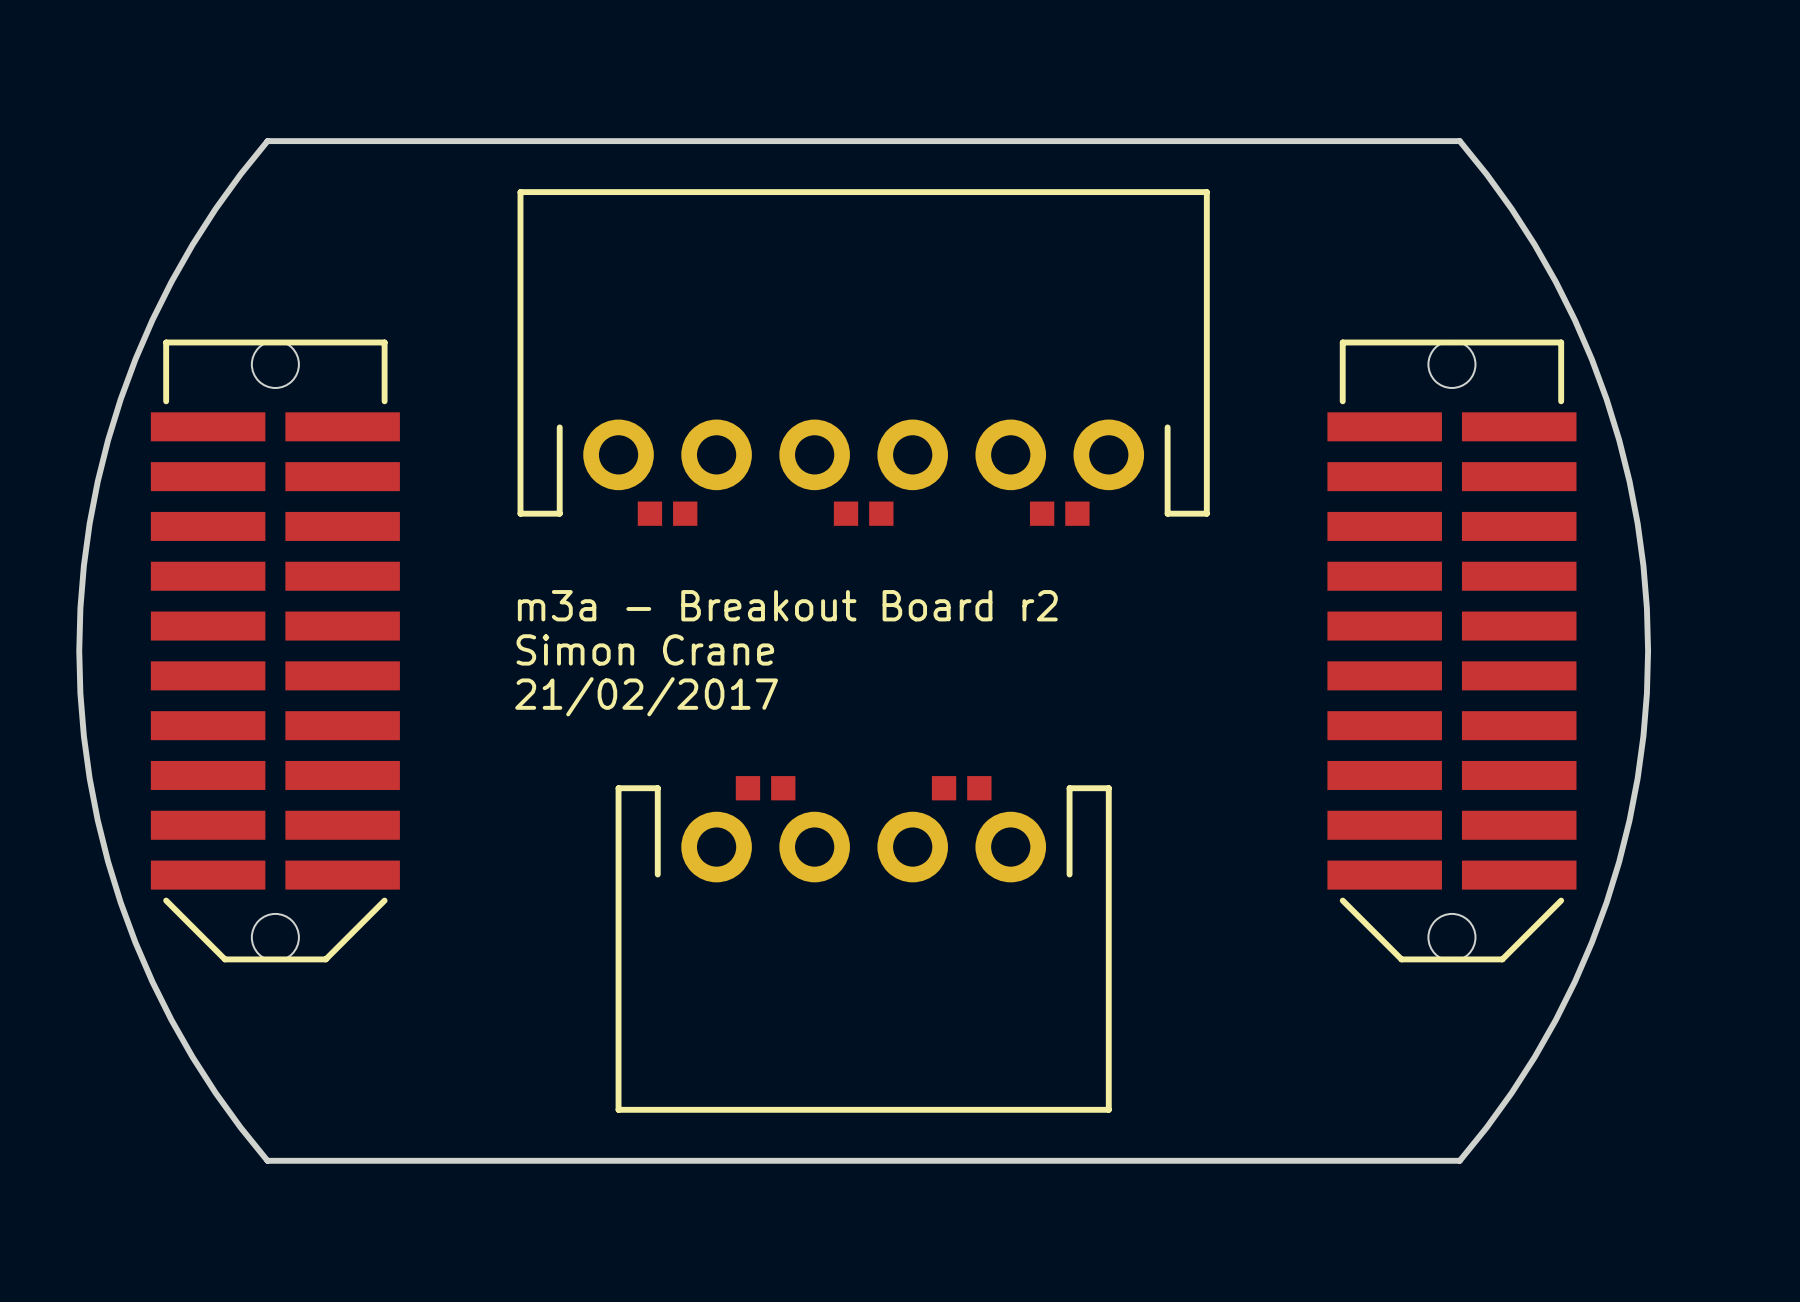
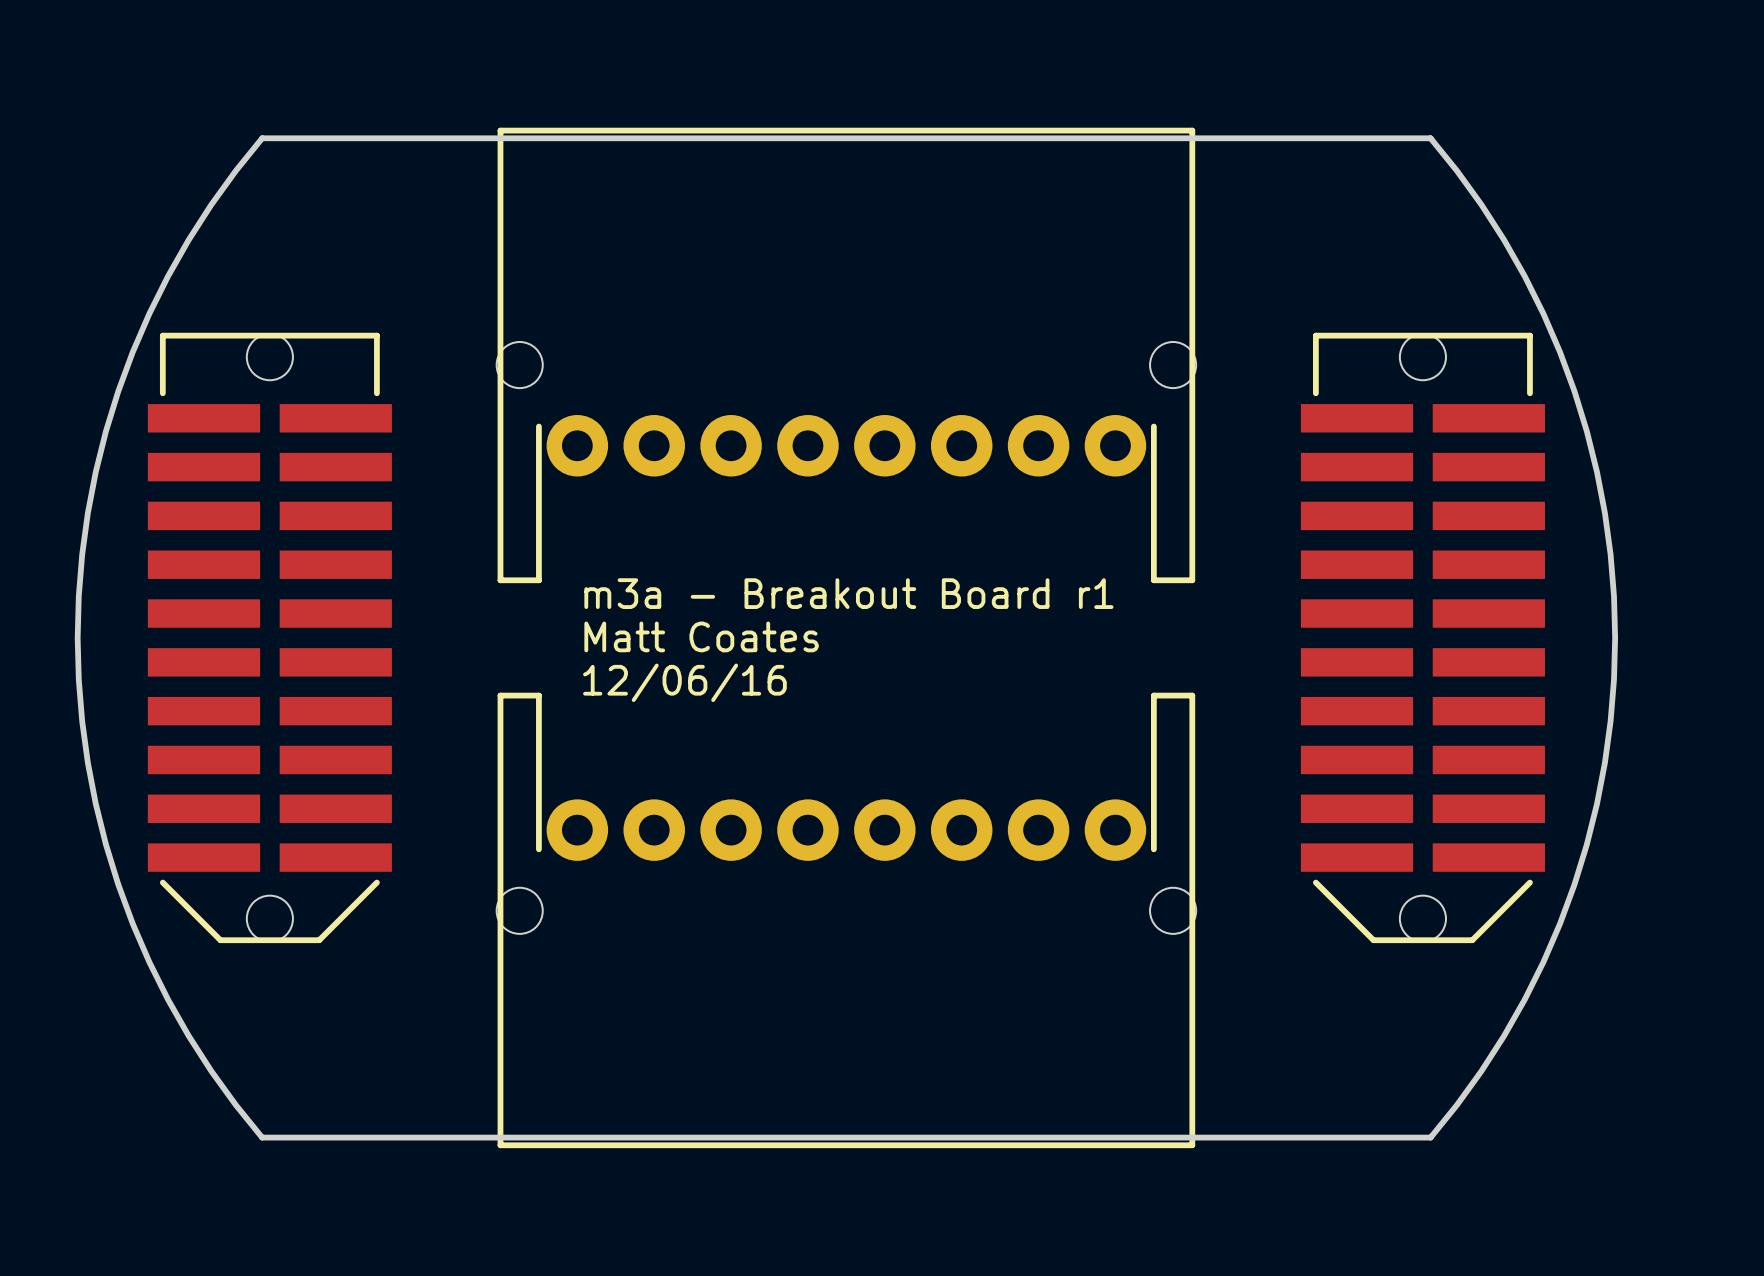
part footprint: [517, 189, 1210, 517] -> [496, 127, 1197, 584]
part: (667, 513) -> none
part: (863, 513) -> none
part: (1059, 513) -> none
text: m3a - Breakout Board r2 (787, 605) -> m3a - Breakout Board r1 (848, 593)
text: Simon Crane (645, 649) -> none
text: none -> Matt Coates (701, 636)
text: 21/02/2017 (646, 696) -> none
text: none -> 12/06/16 (684, 682)
part footprint: [615, 785, 1112, 1113] -> [496, 692, 1197, 1149]
part: (765, 788) -> none
part: (961, 788) -> none

